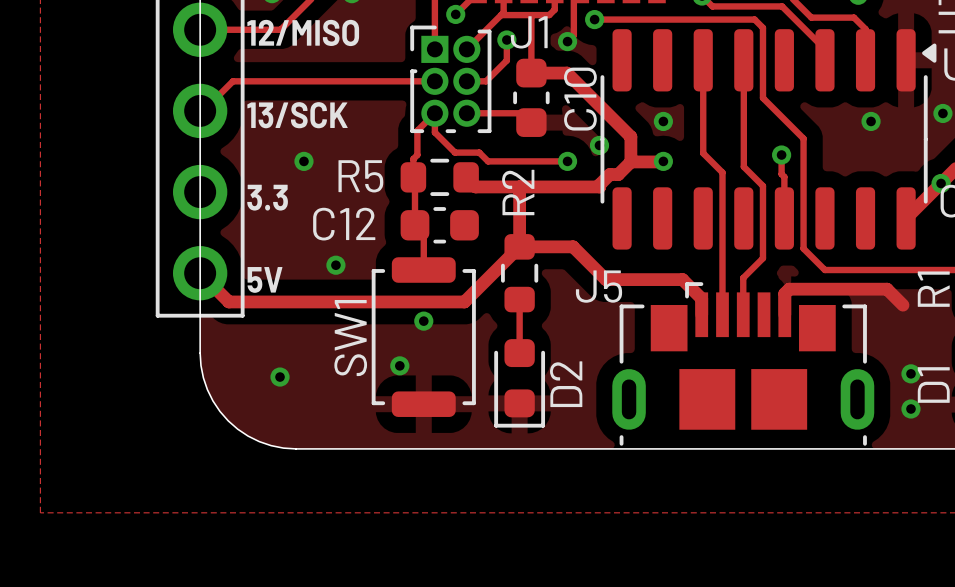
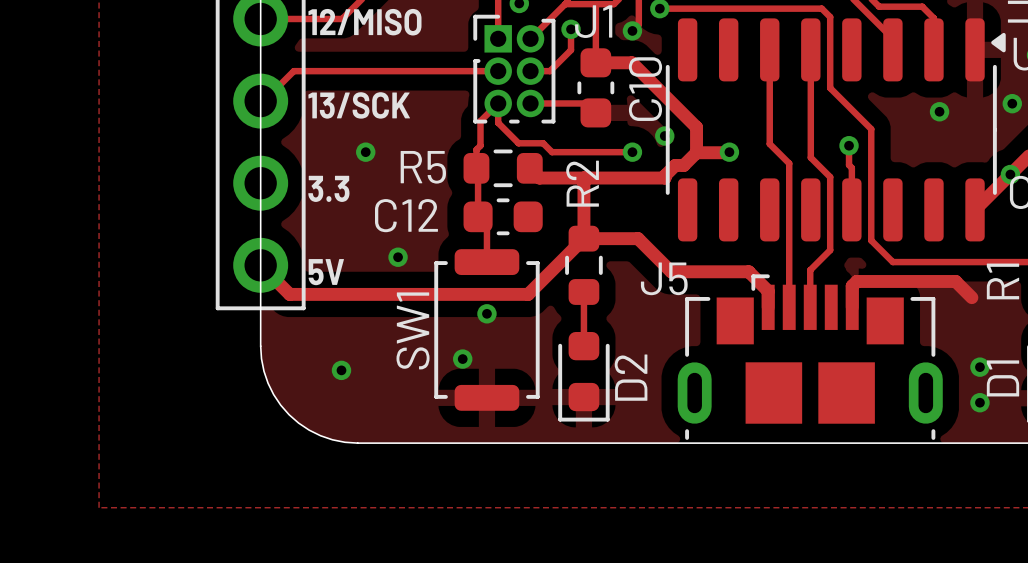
via: (663, 121) -> none

